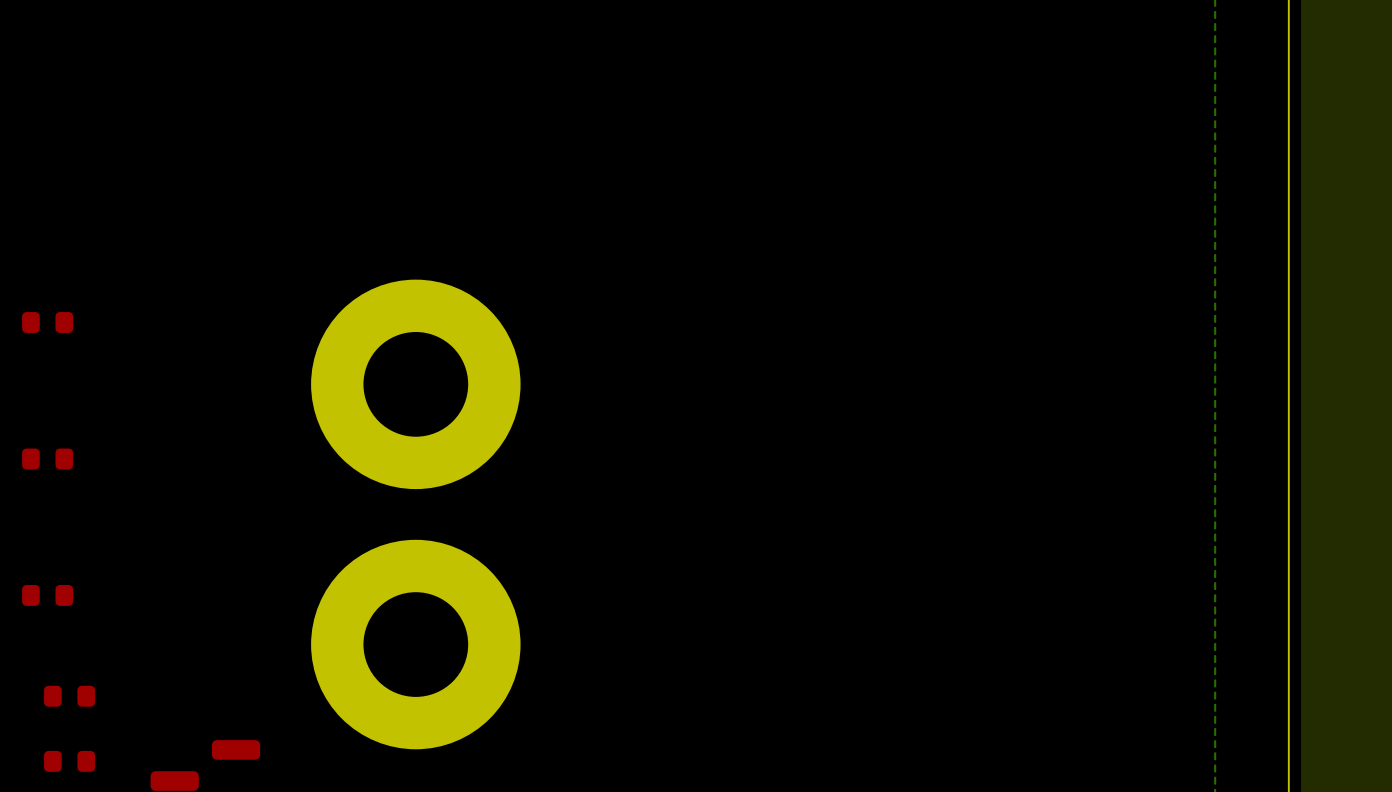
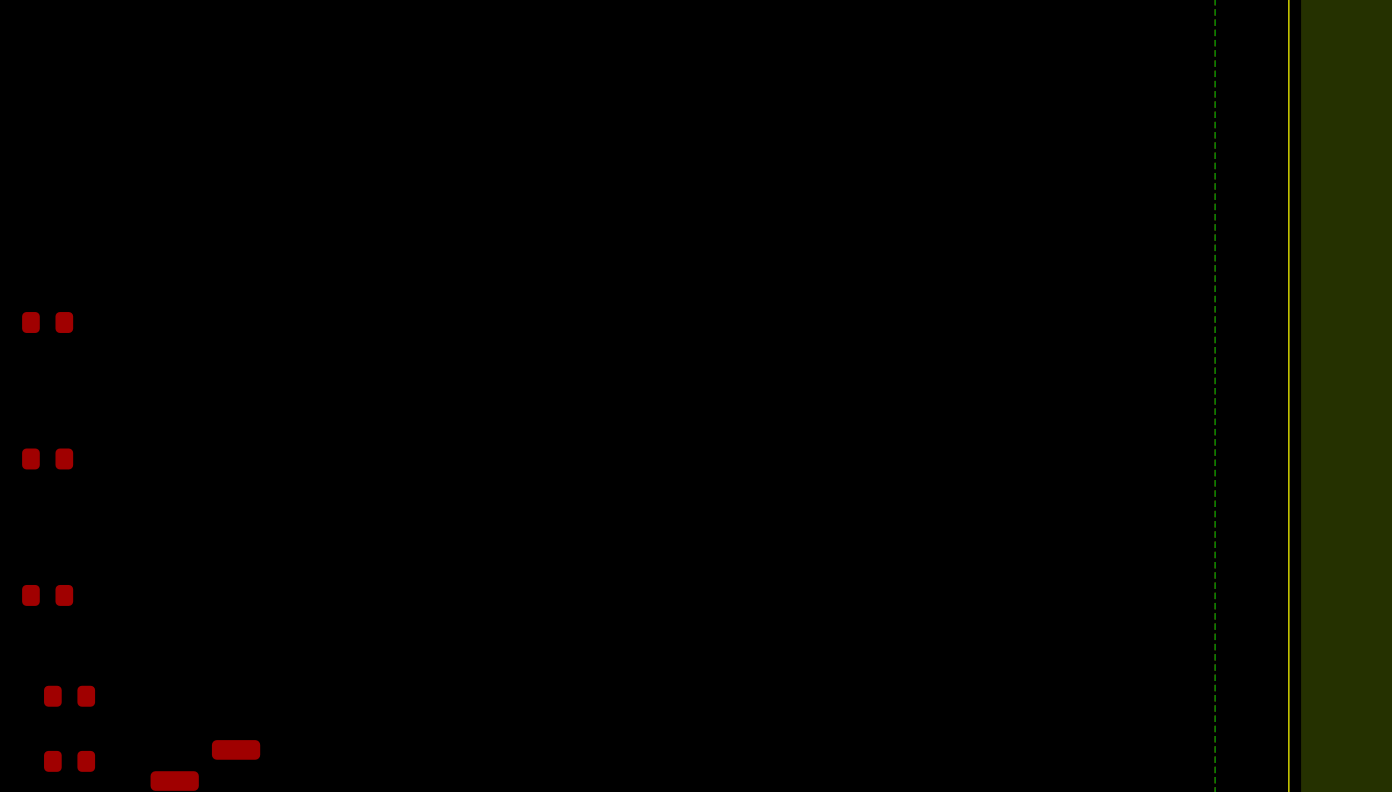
part: (415, 384) -> none
part: (415, 644) -> none

